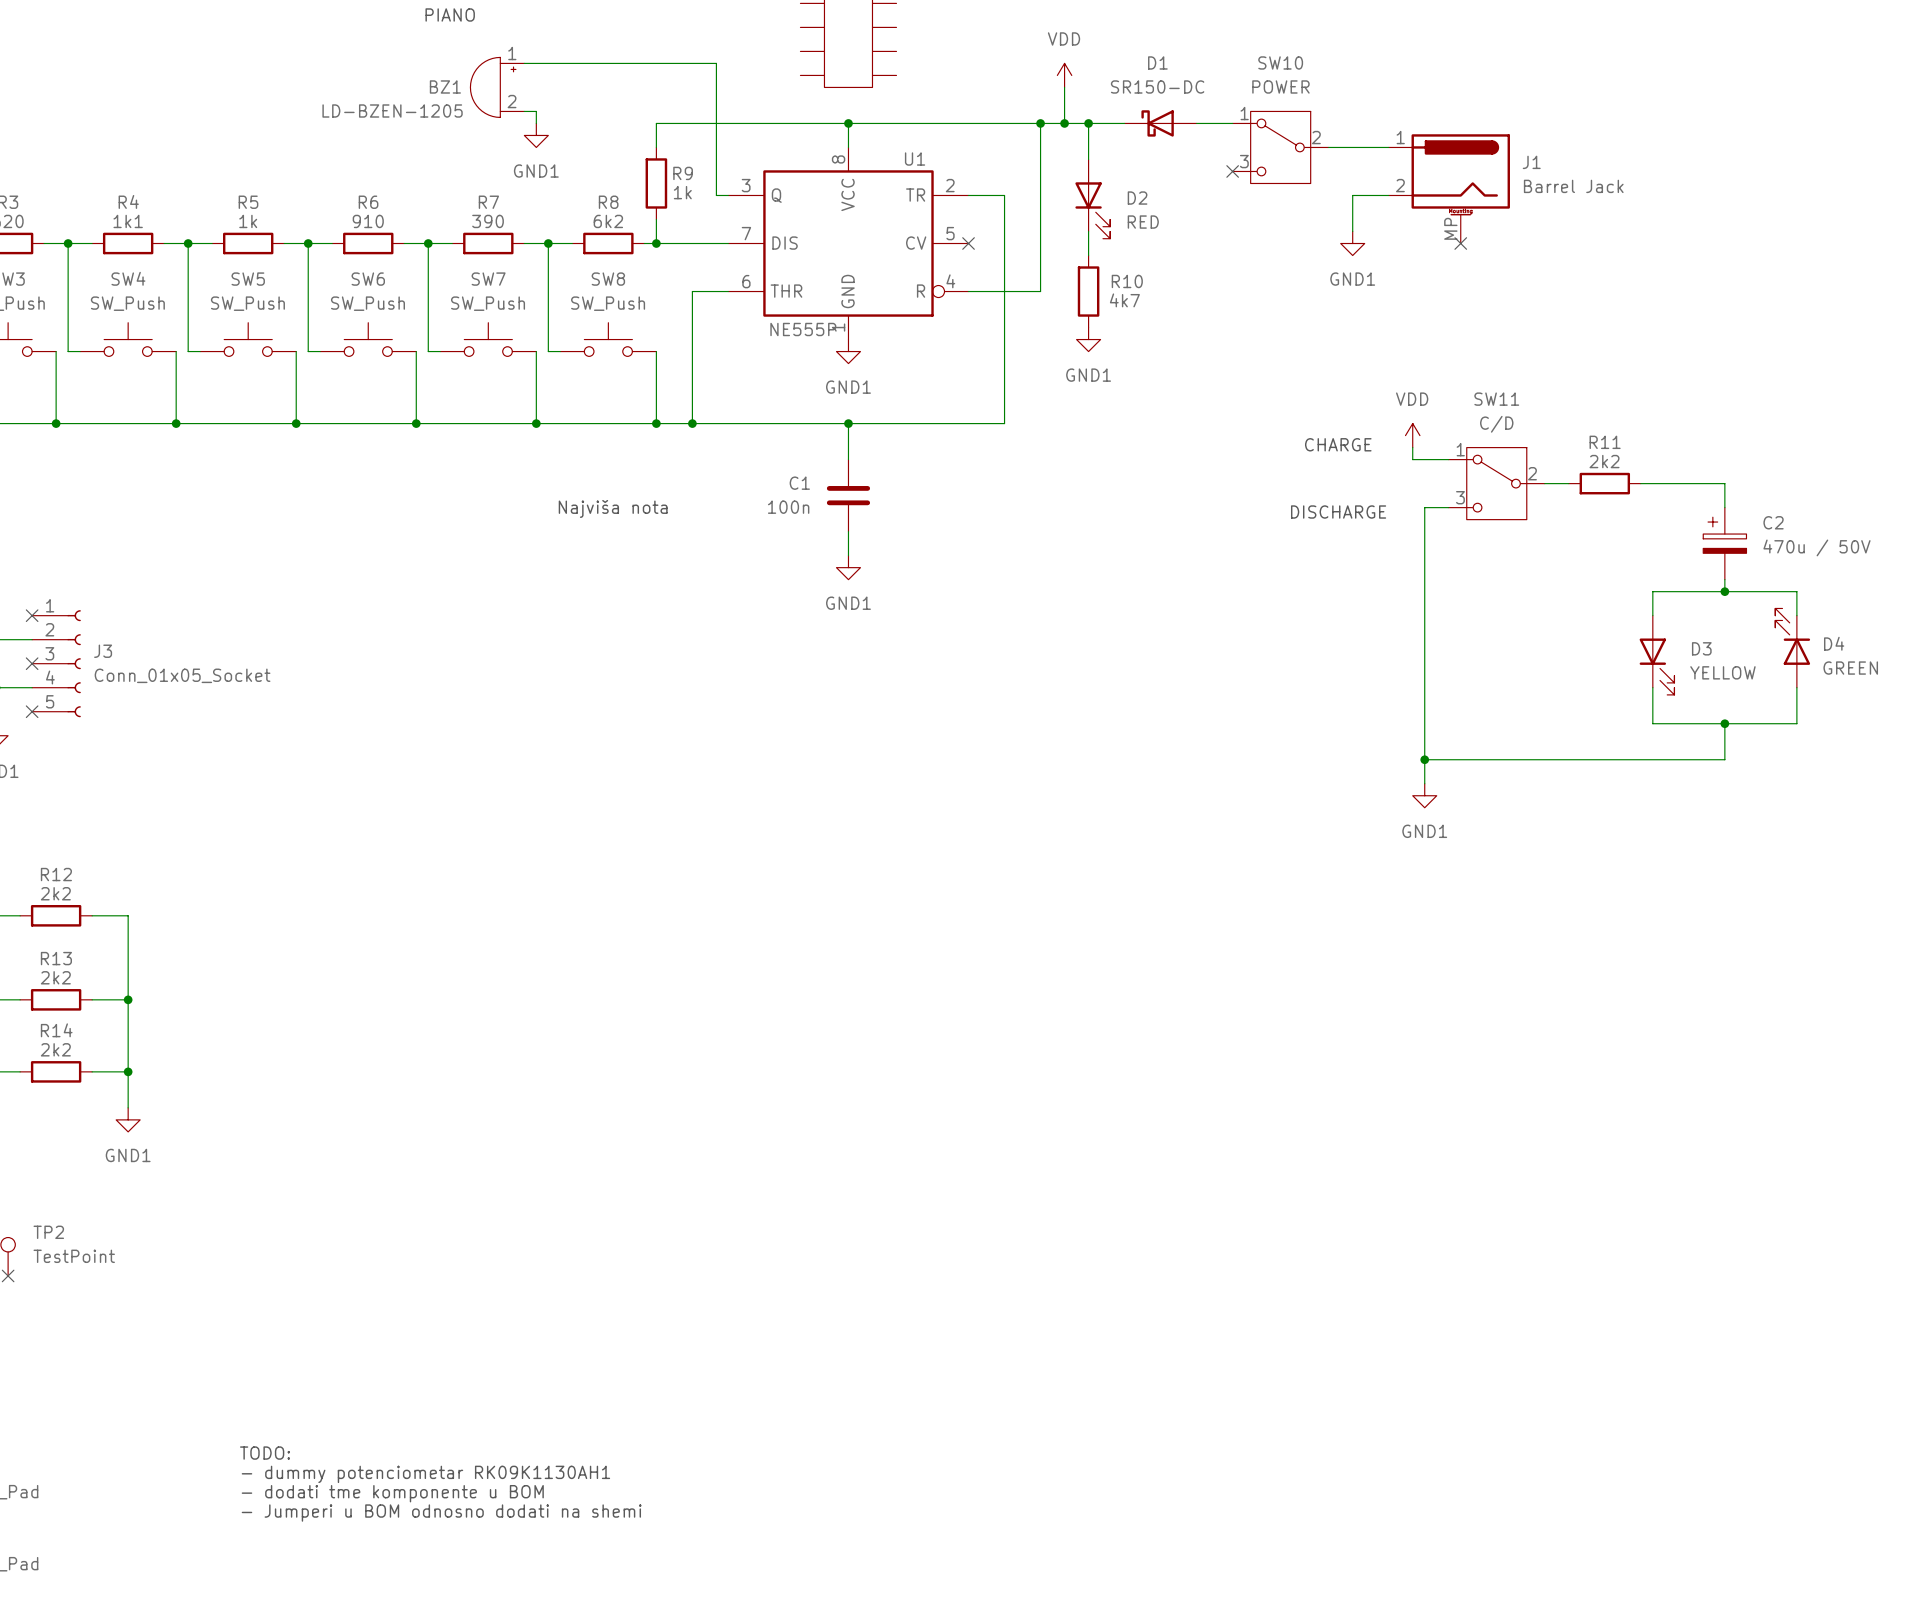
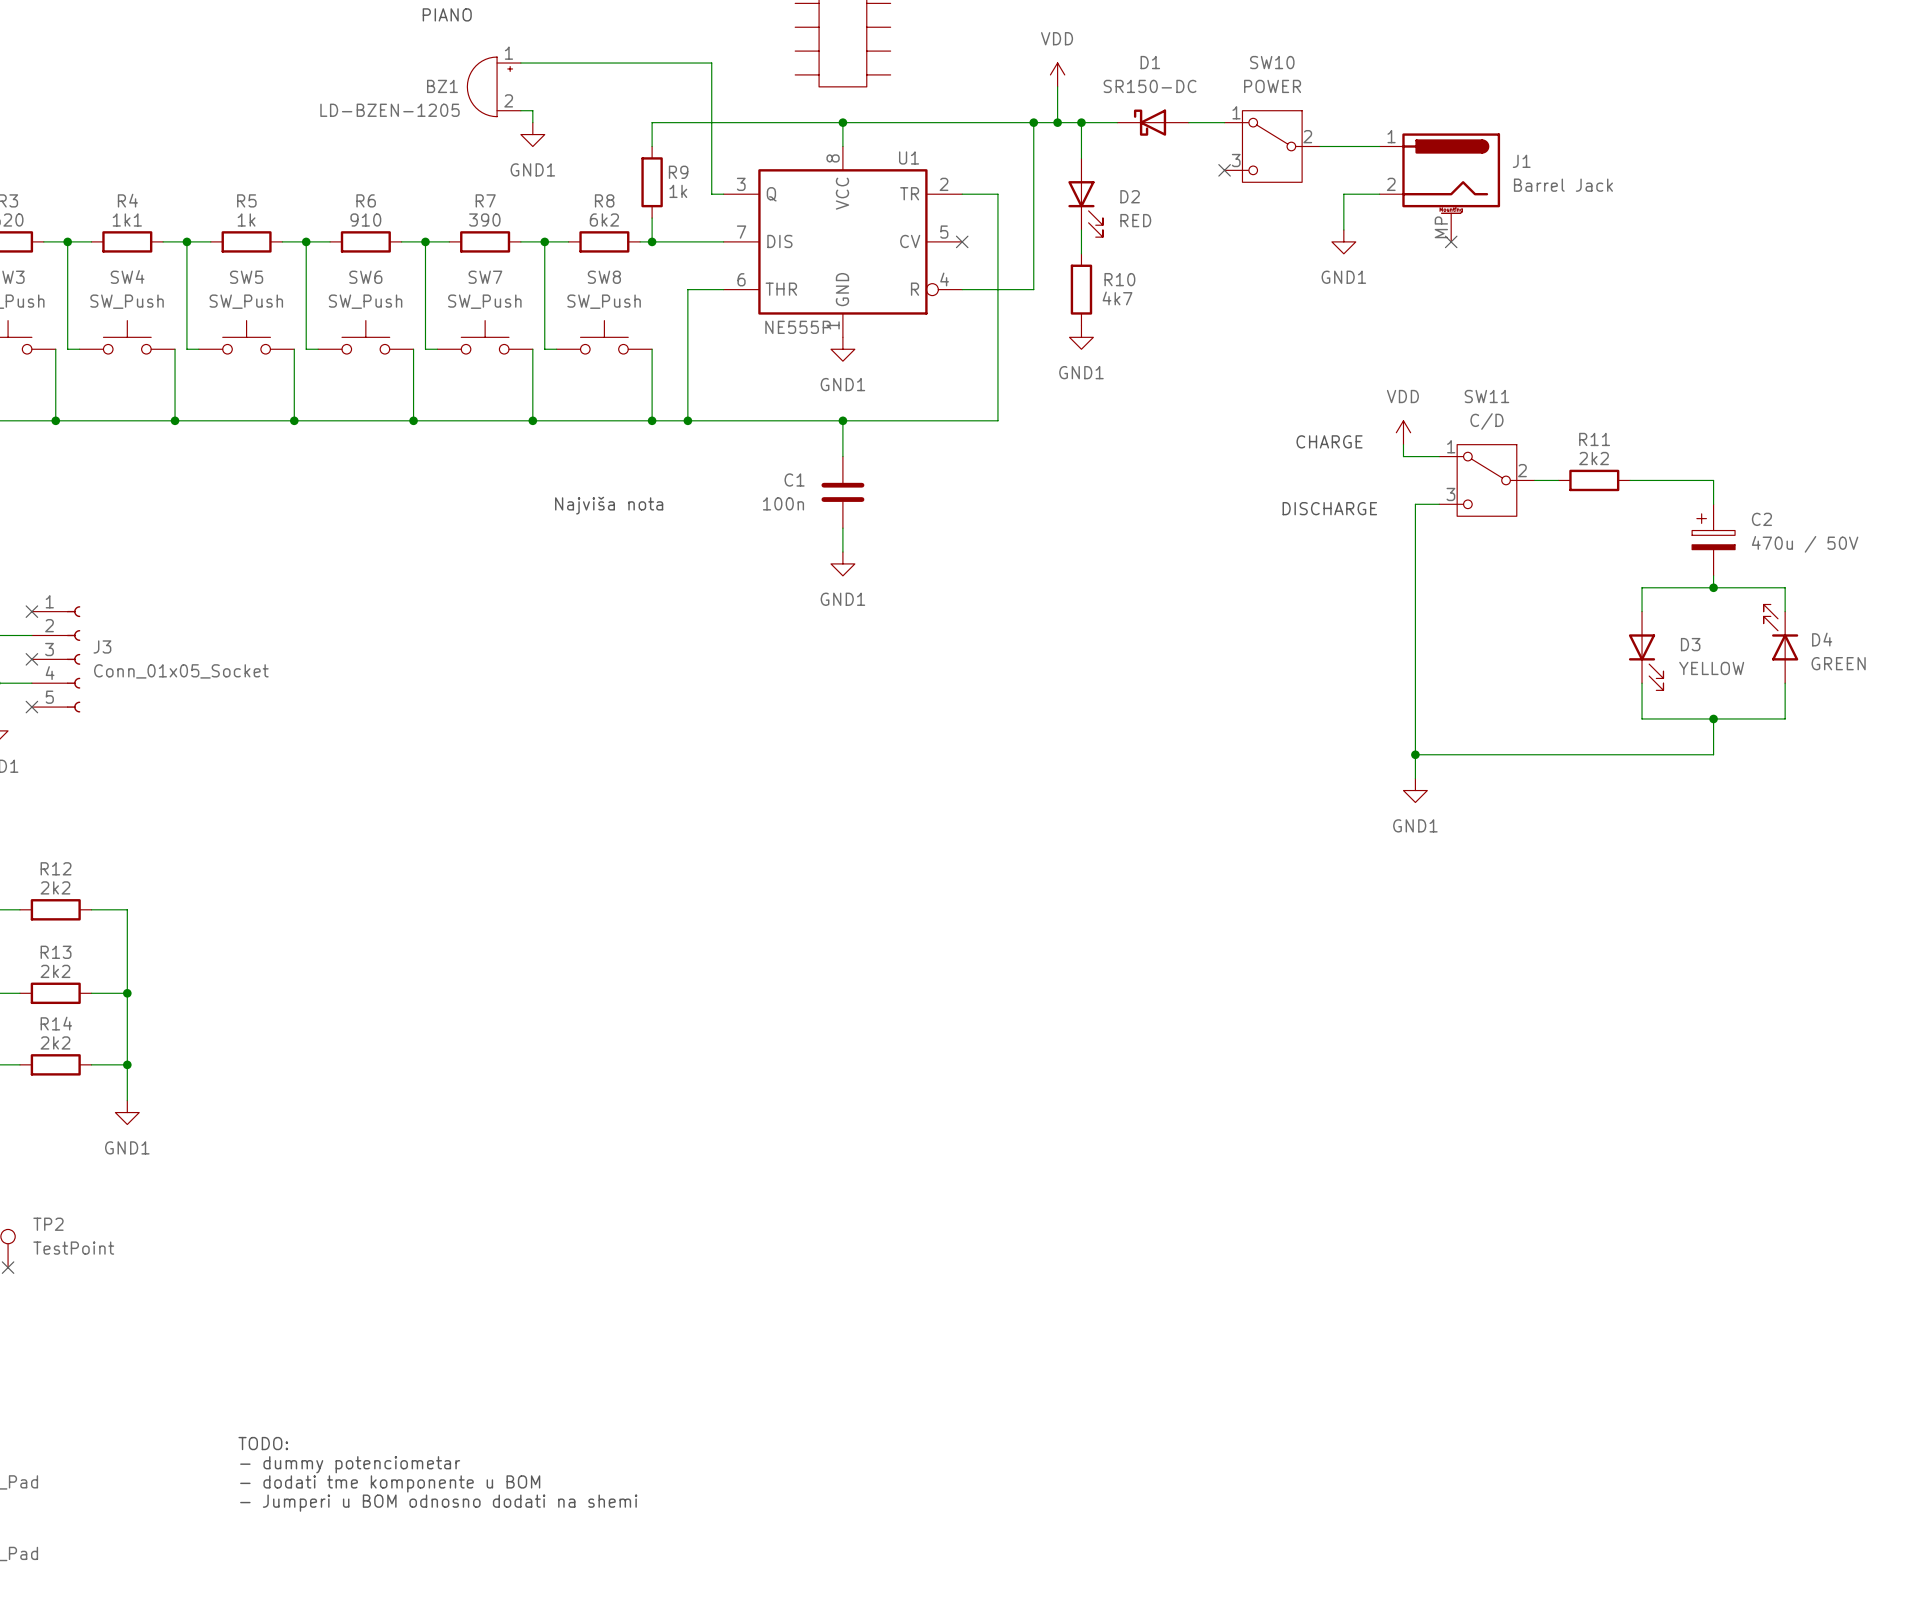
text: - dummy potenciometar RK09K1130AH1 (425, 1474) -> - dummy potenciometar (350, 1464)

